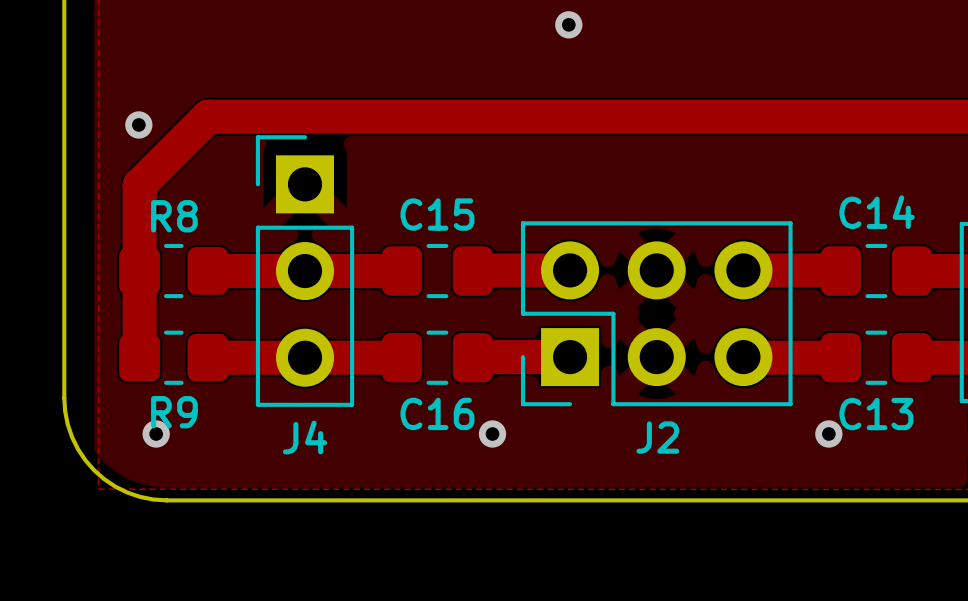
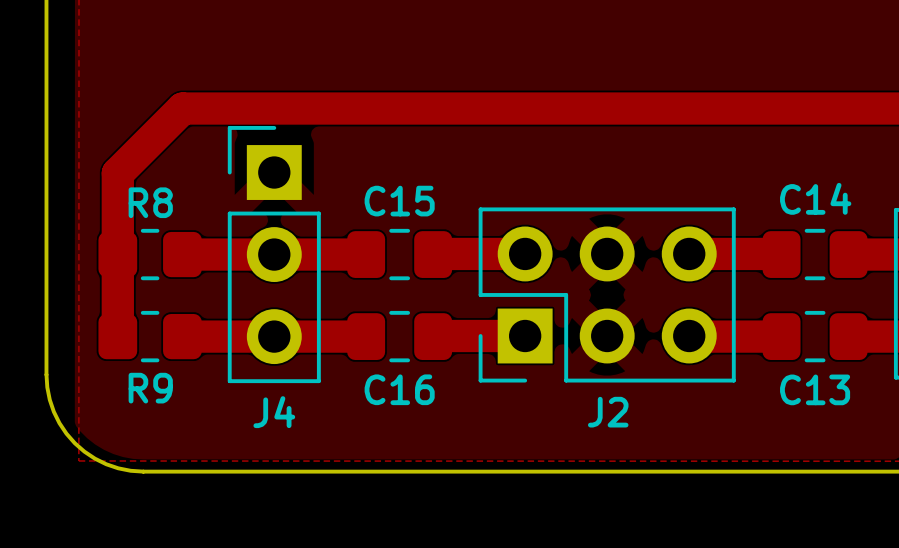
via: (568, 24) -> none
via: (138, 124) -> none
via: (156, 434) -> none
via: (492, 434) -> none
via: (828, 434) -> none

